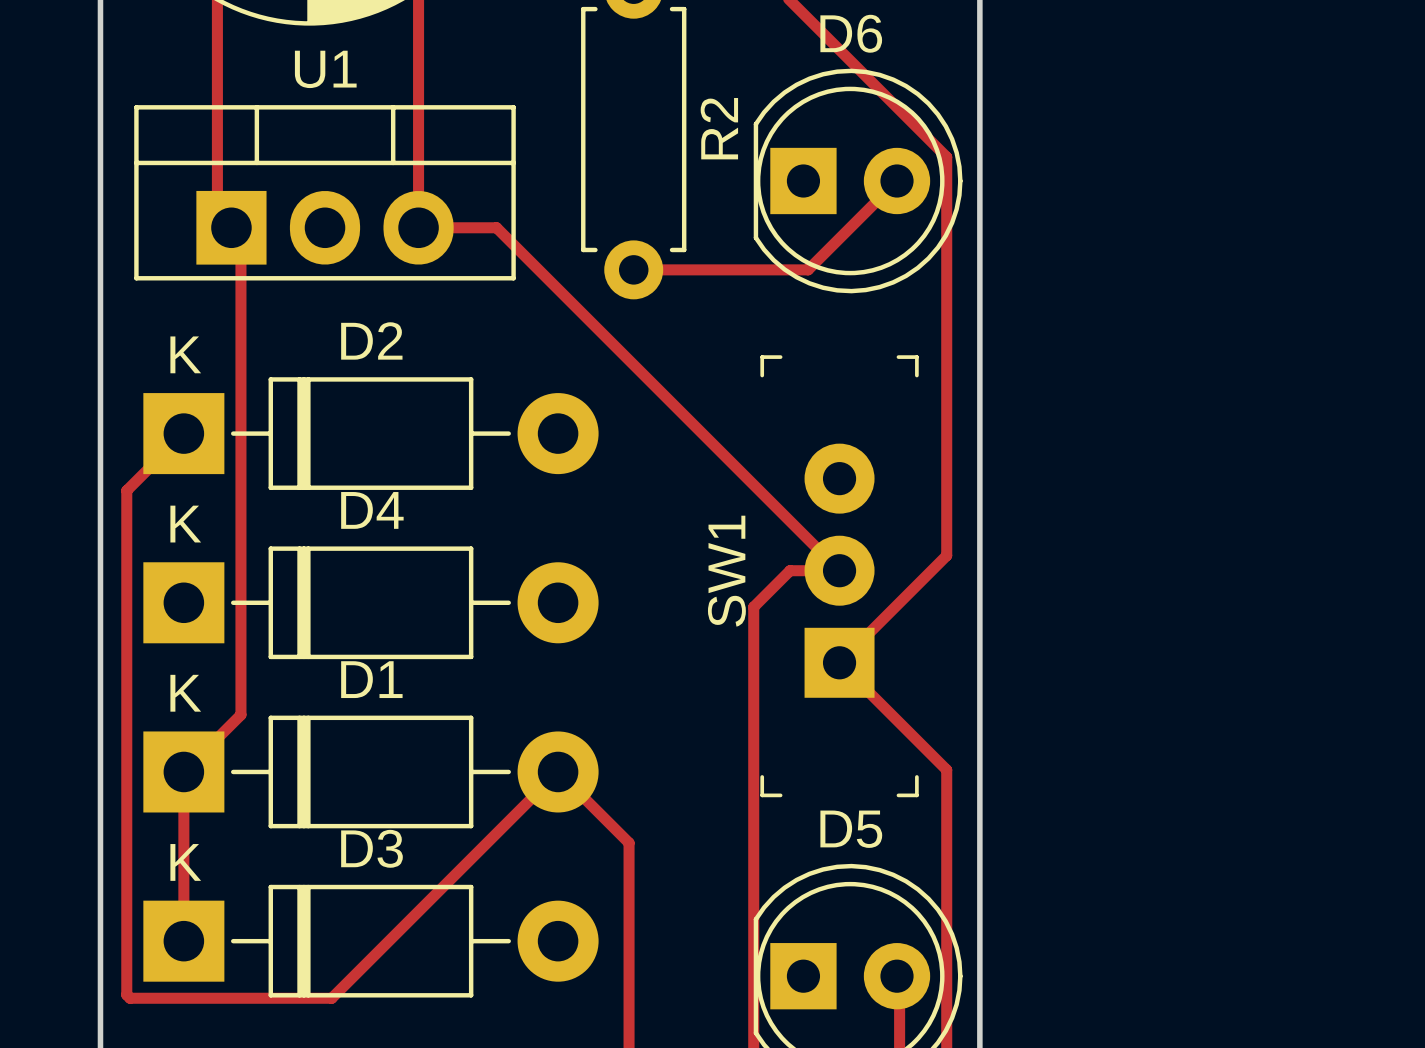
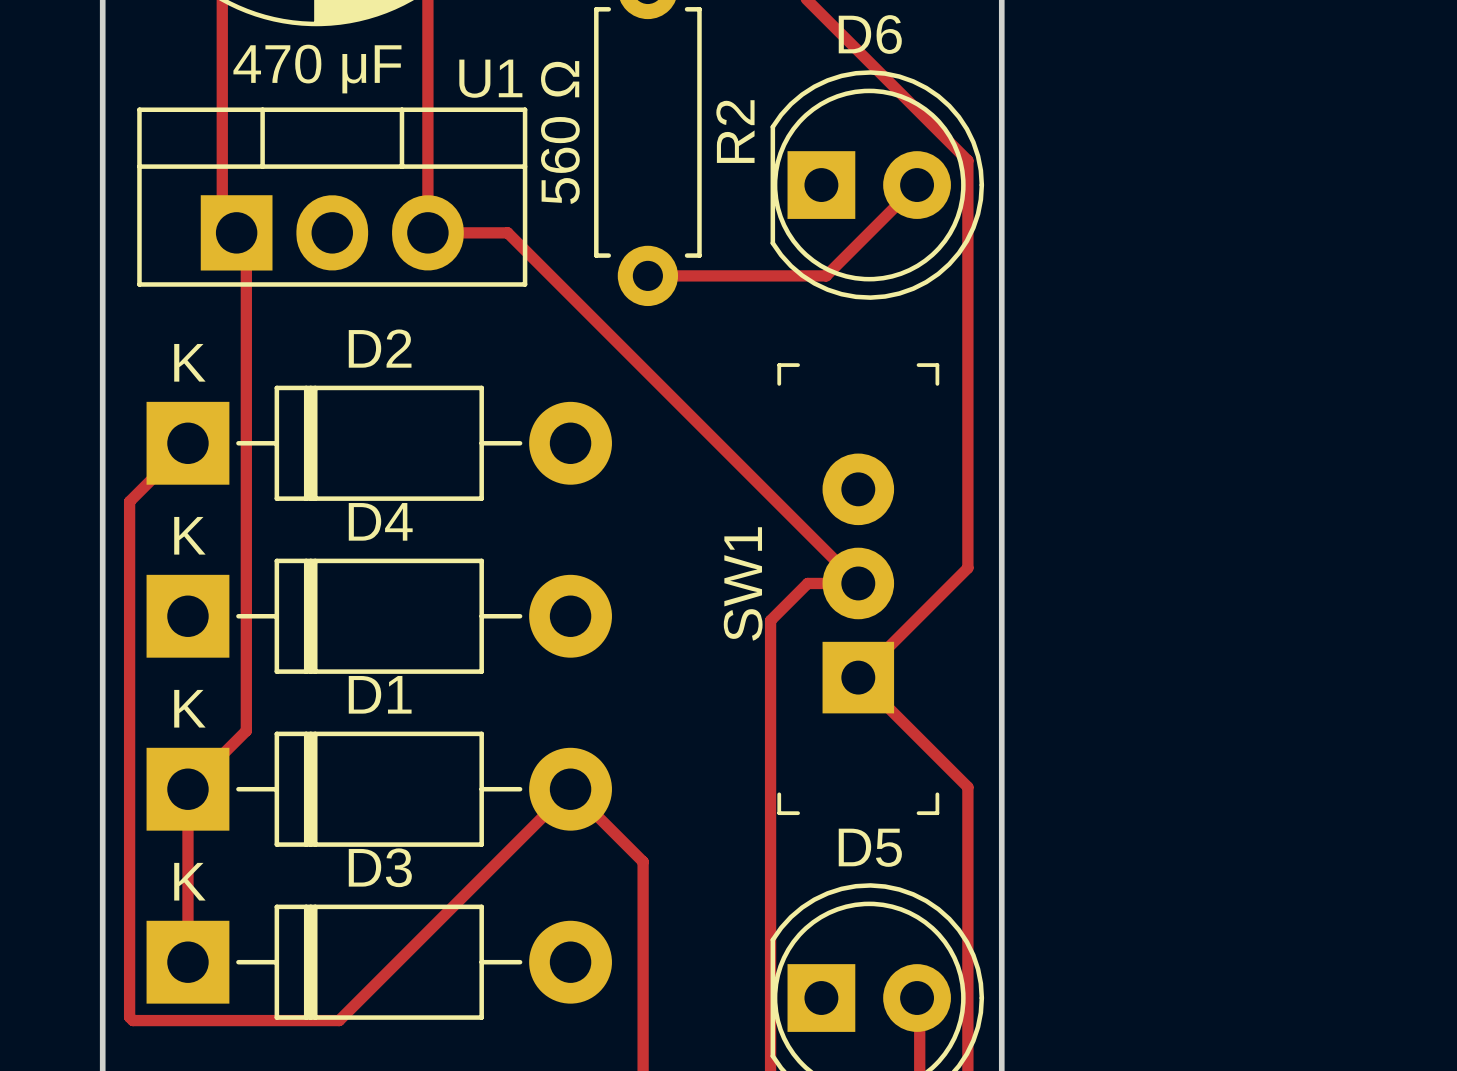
text: none -> 470 μF (317, 69)
U1 name position: U1 (325, 69) -> U1 (490, 78)
text: none -> 560 Ω (560, 132)

